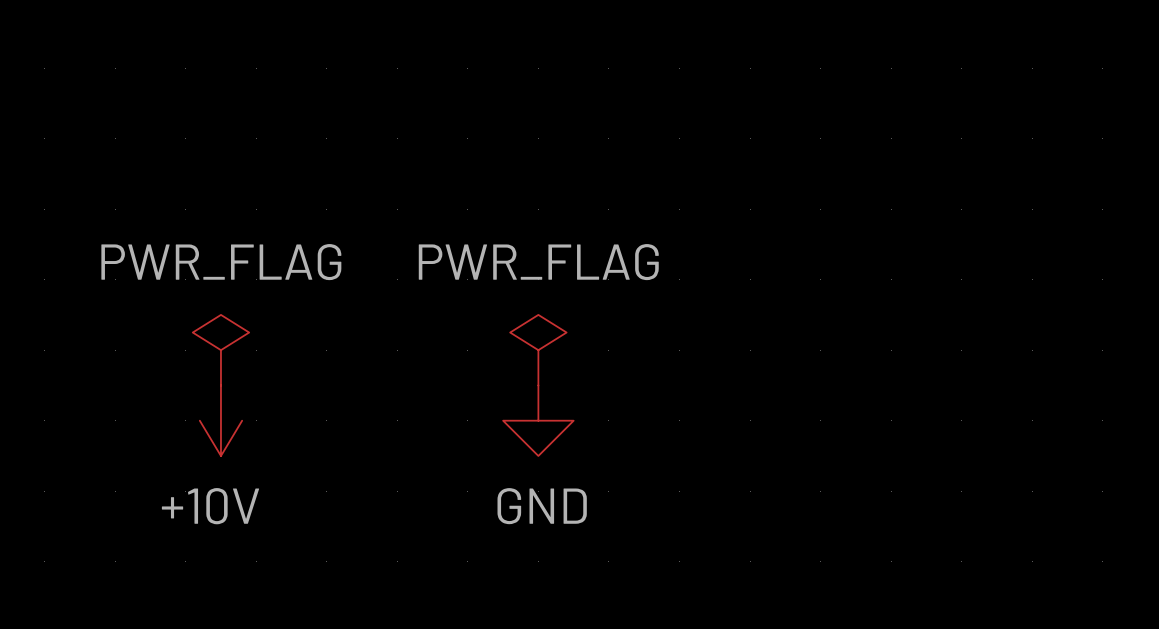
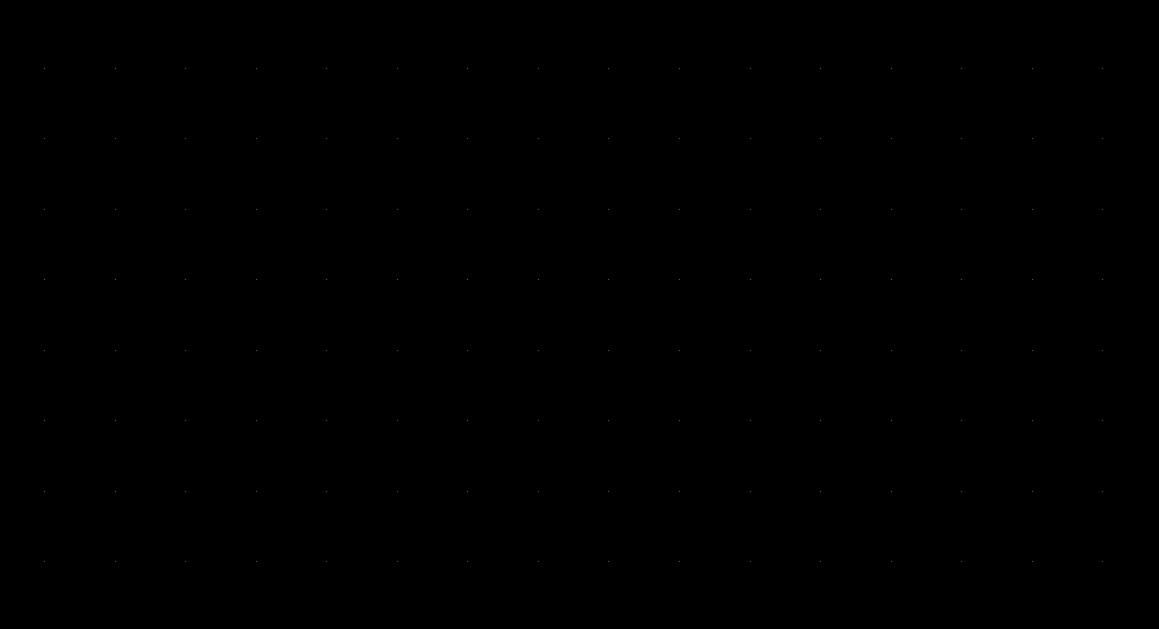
power symbol: PWR_FLAG (220, 350) -> none
power symbol: PWR_FLAG (538, 350) -> none
power symbol: +10V (220, 420) -> none
power symbol: GND (538, 420) -> none

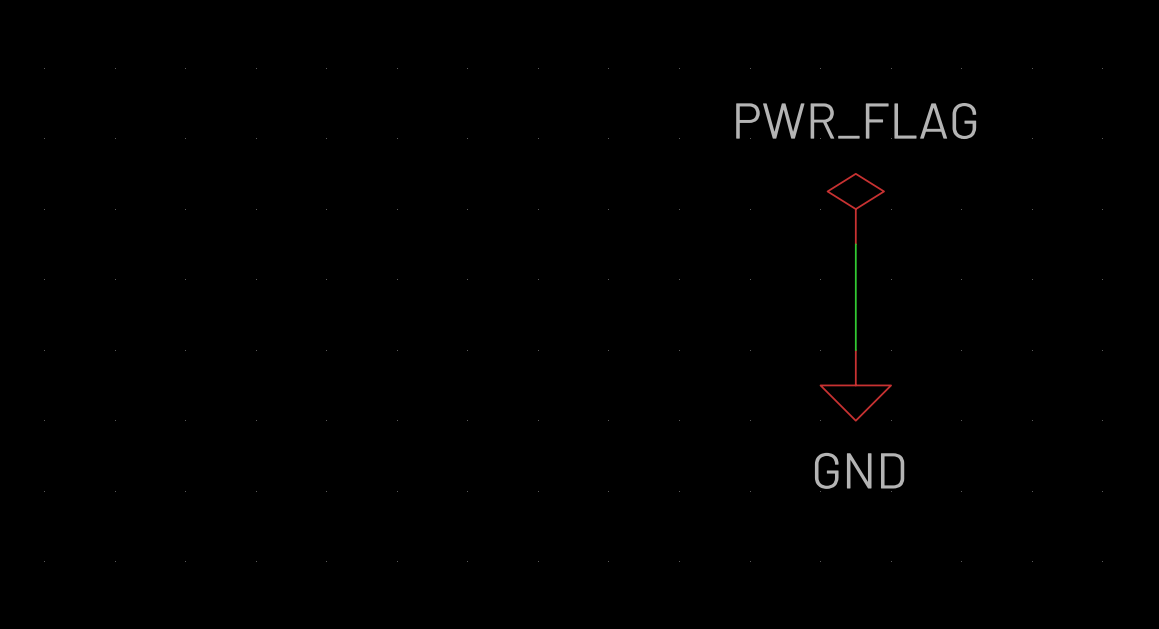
power symbol: none -> PWR_FLAG (855, 209)
wire: none -> (855, 244) (855, 350)
power symbol: none -> GND (855, 385)

